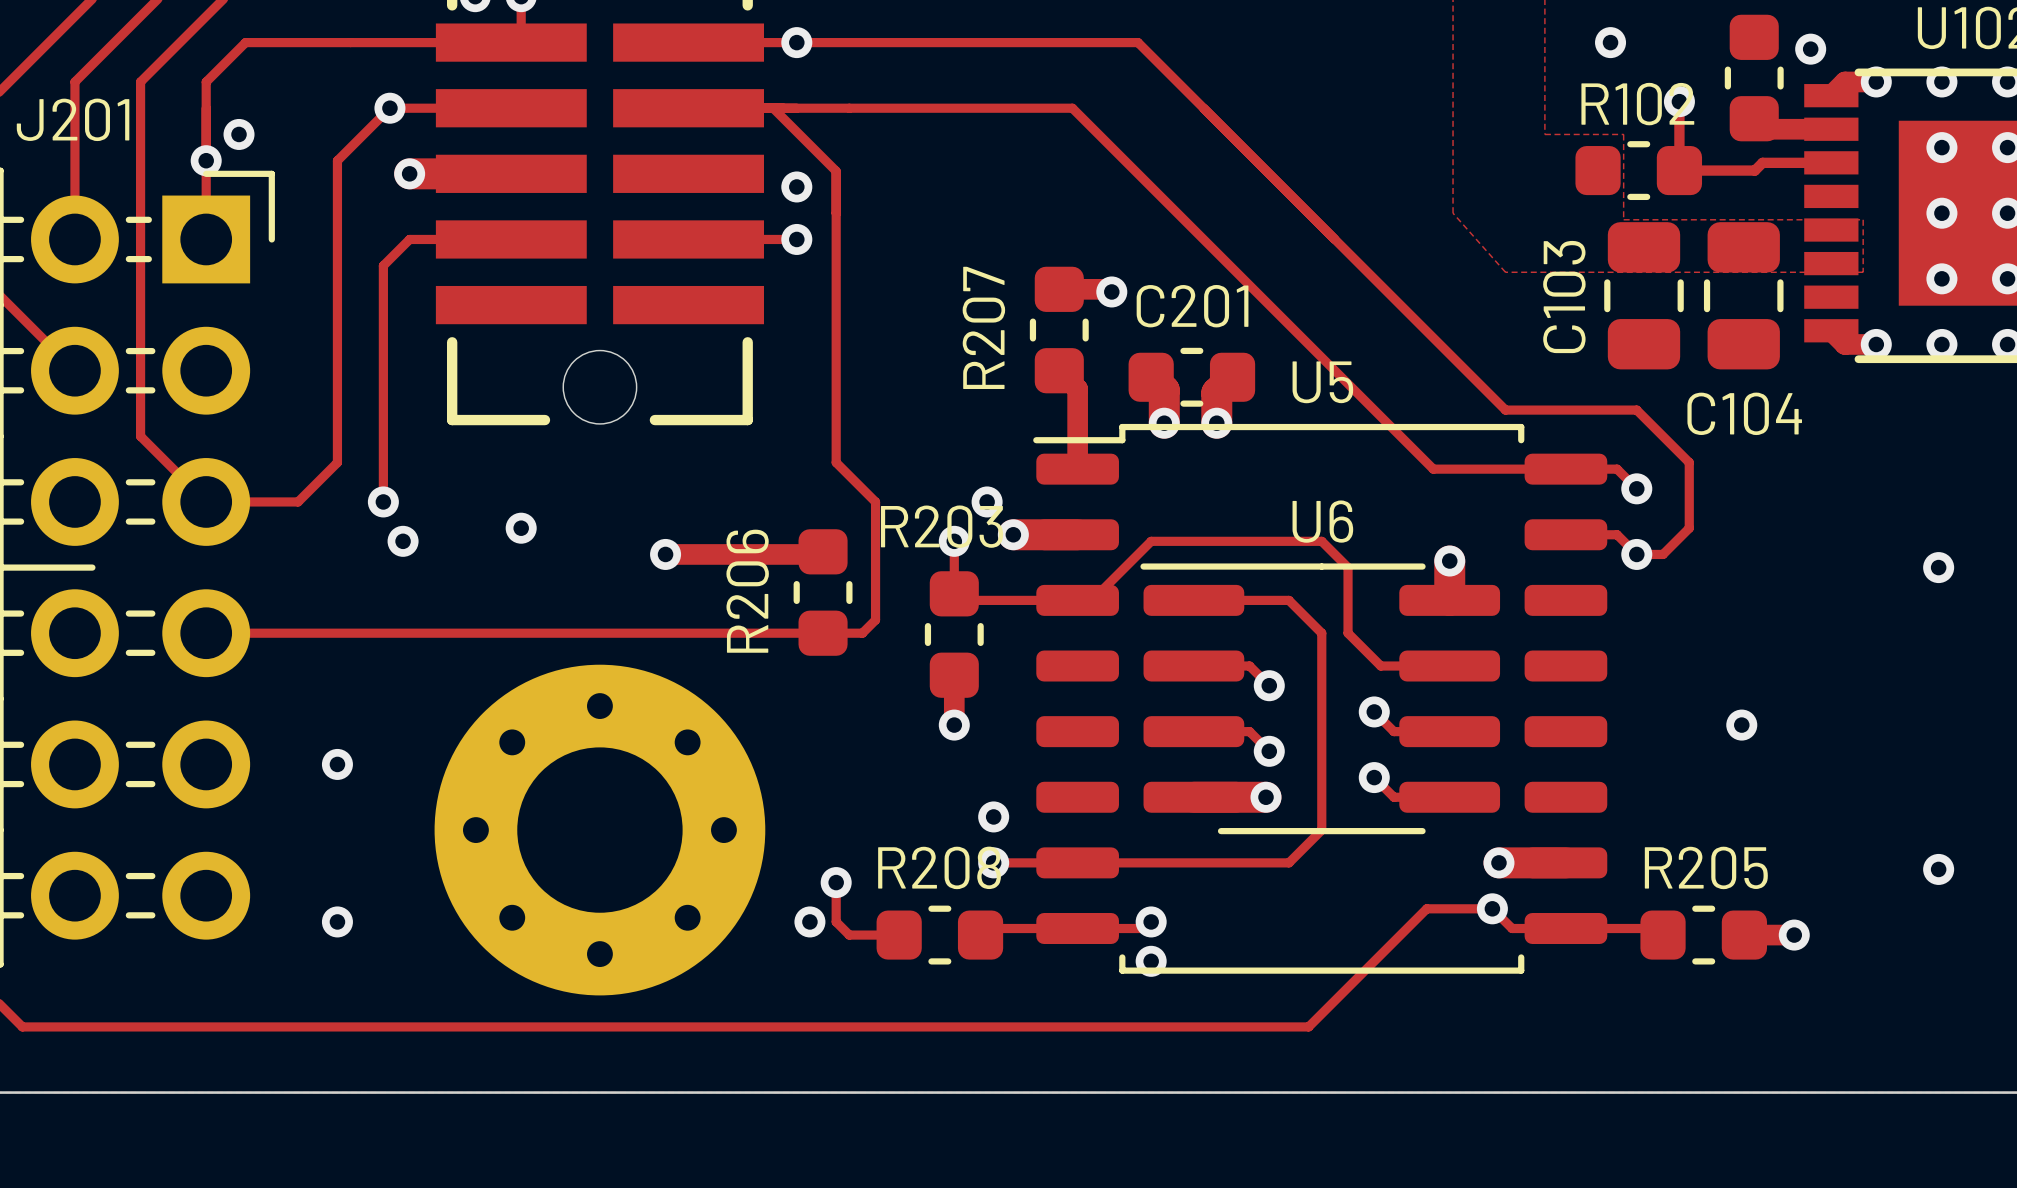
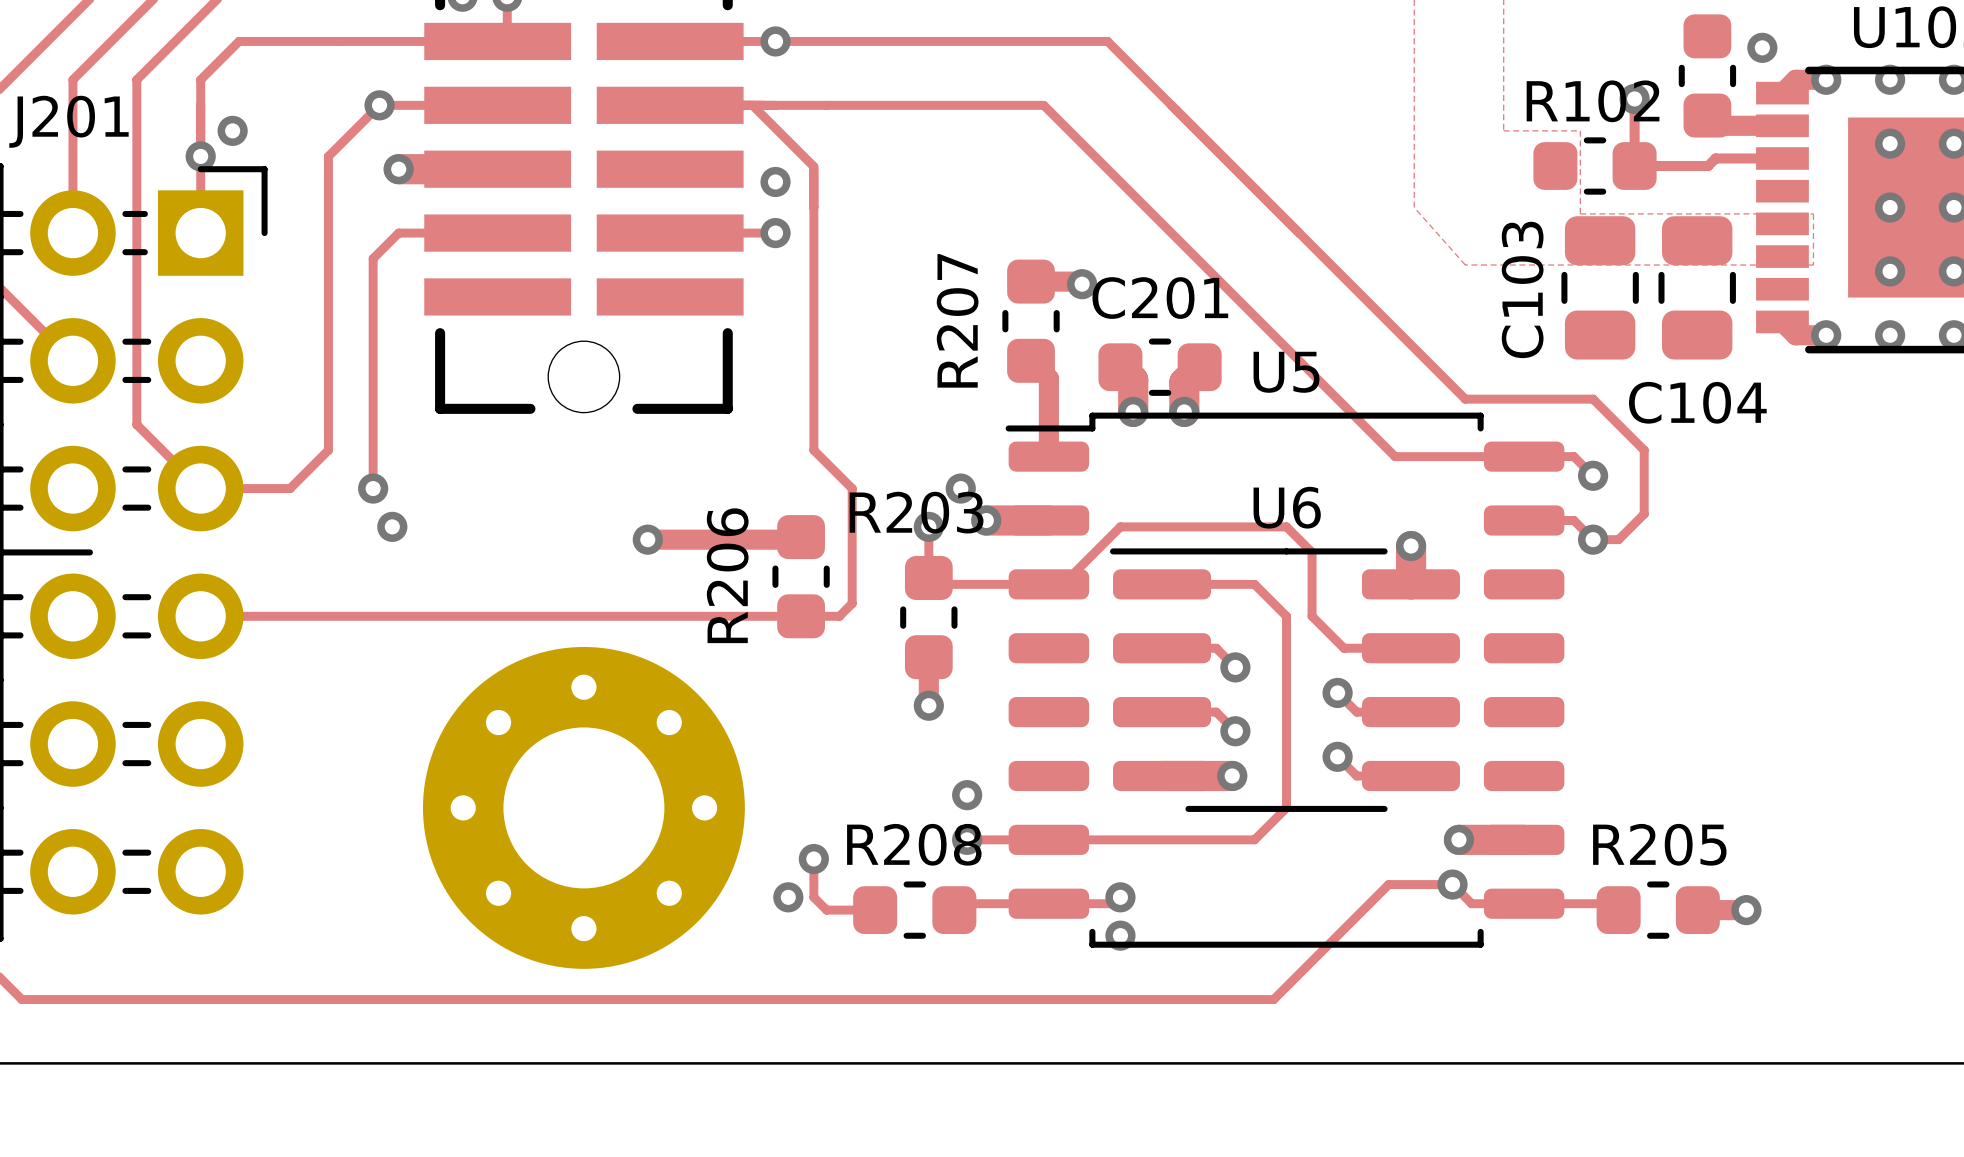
via: (1610, 42) -> none
via: (521, 528) -> none
via: (1938, 567) -> none
via: (1741, 725) -> none
via: (337, 764) -> none
via: (1938, 869) -> none
via: (337, 921) -> none

